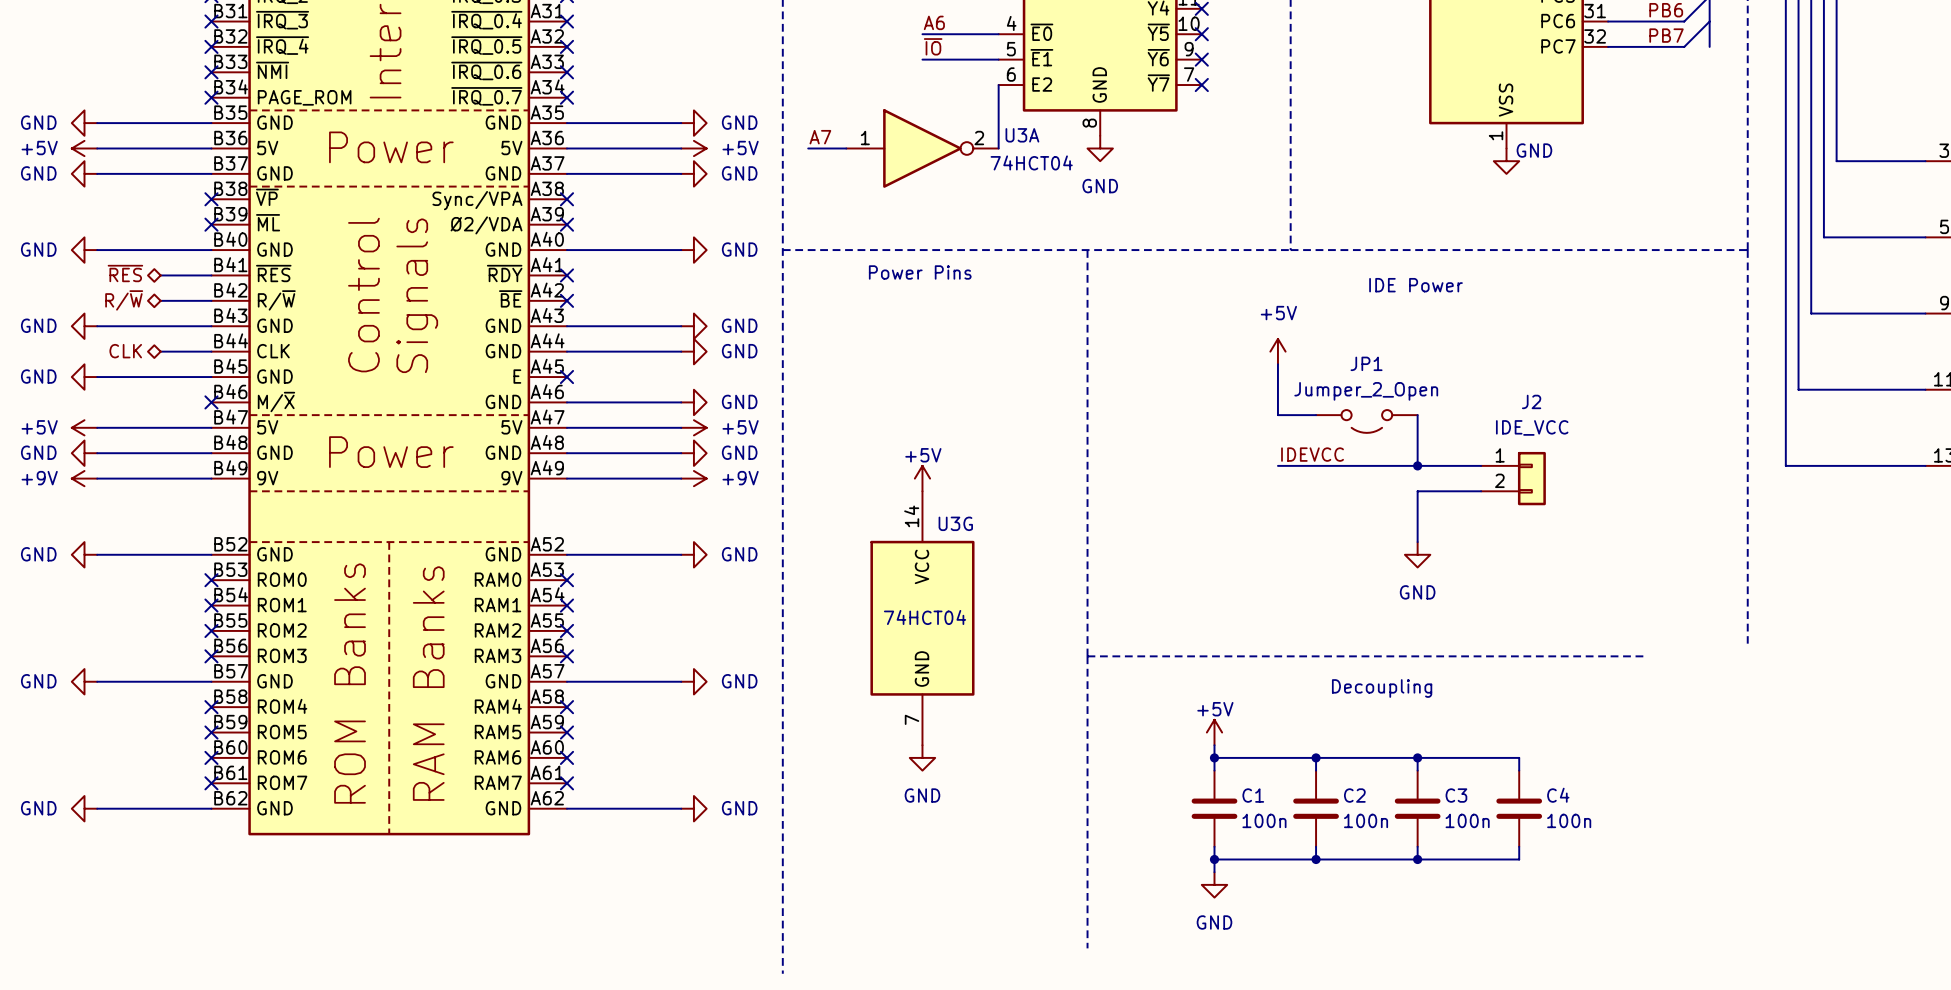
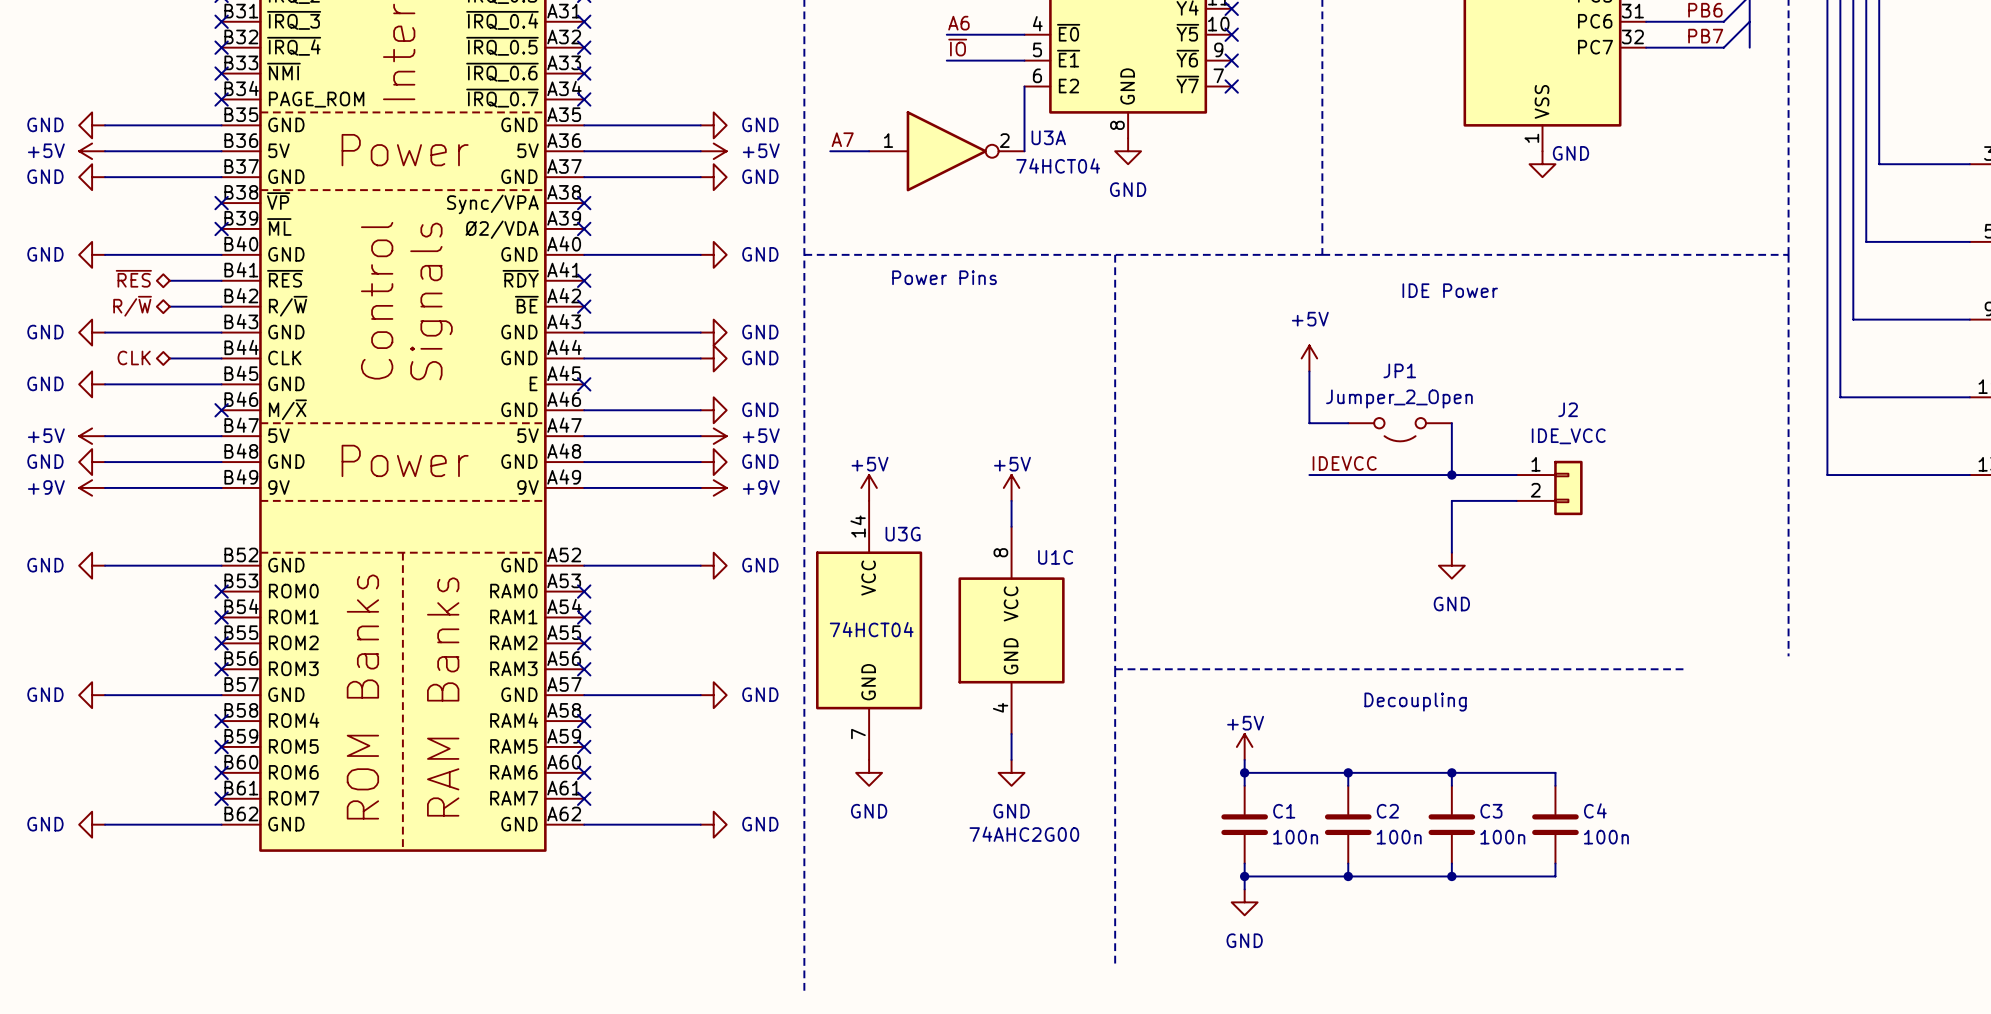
power symbol: none -> +5V (869, 487)
power symbol: +5V (922, 478) -> none
power symbol: none -> +5V (1011, 487)
wire: none -> (1011, 500) (1011, 526)
U3G position: (922, 618) -> (869, 630)
U1C: none -> 74AHC2G00 (1011, 630)
wire: none -> (1011, 734) (1011, 759)
power symbol: none -> GND (869, 772)
power symbol: GND (922, 757) -> none
power symbol: none -> GND (1011, 772)

